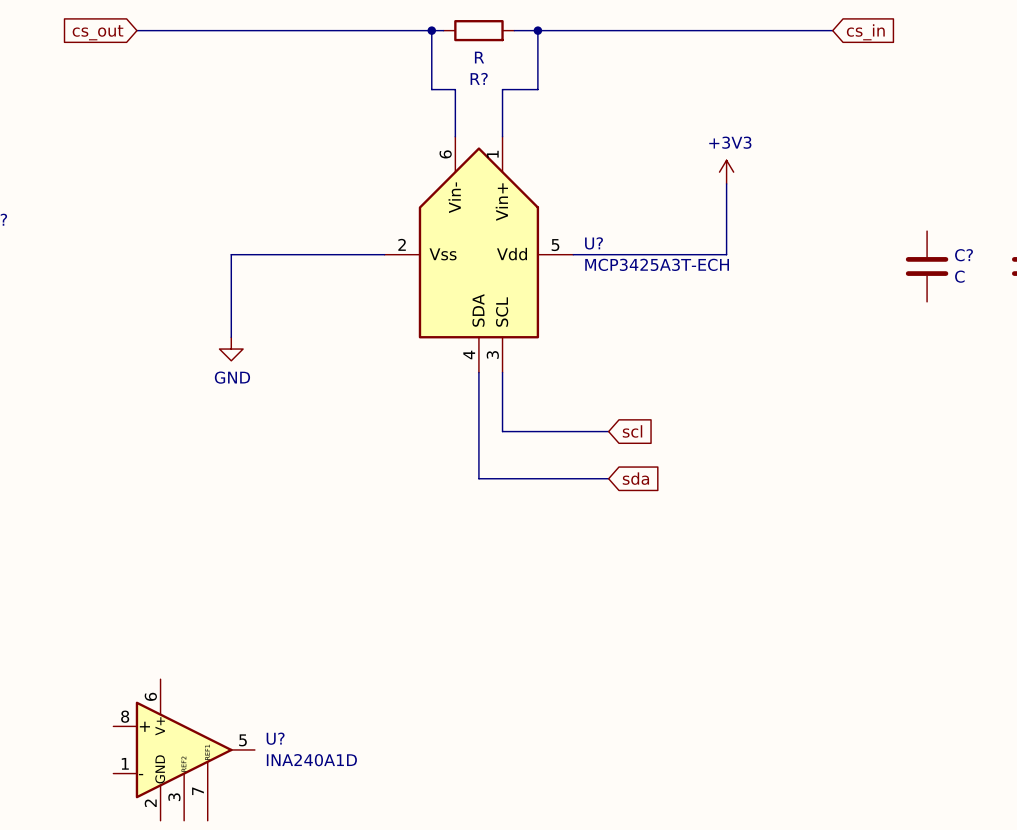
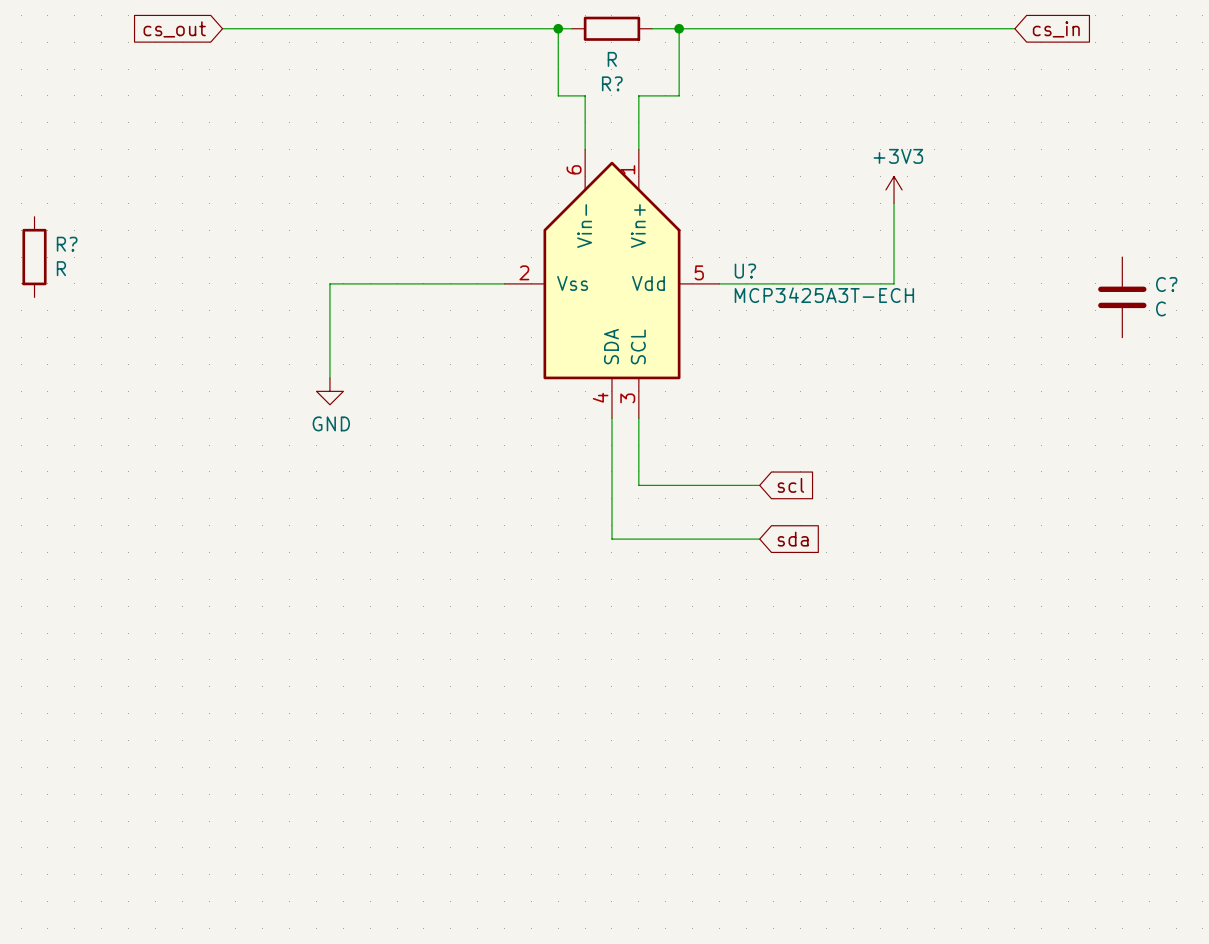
U?: INA240A1D (184, 749) -> none

